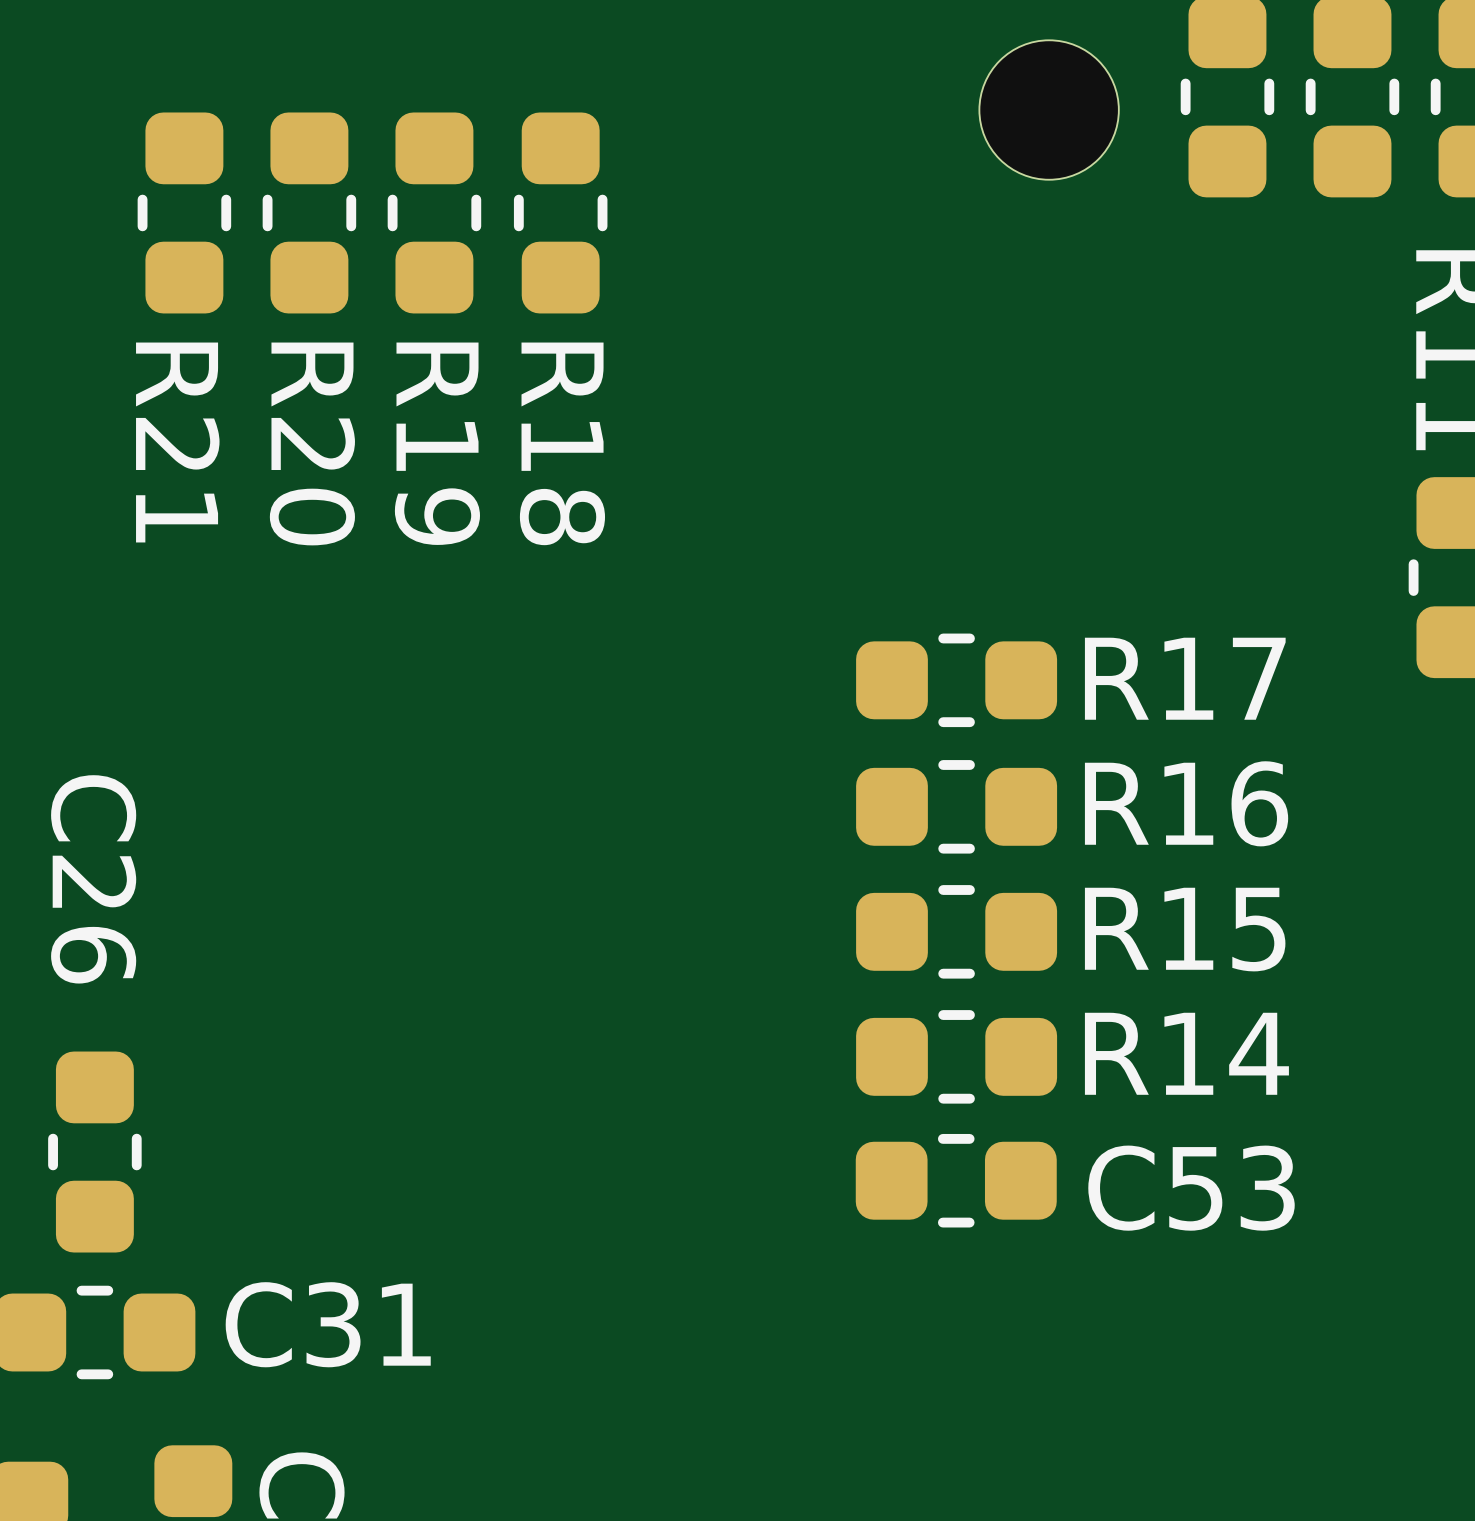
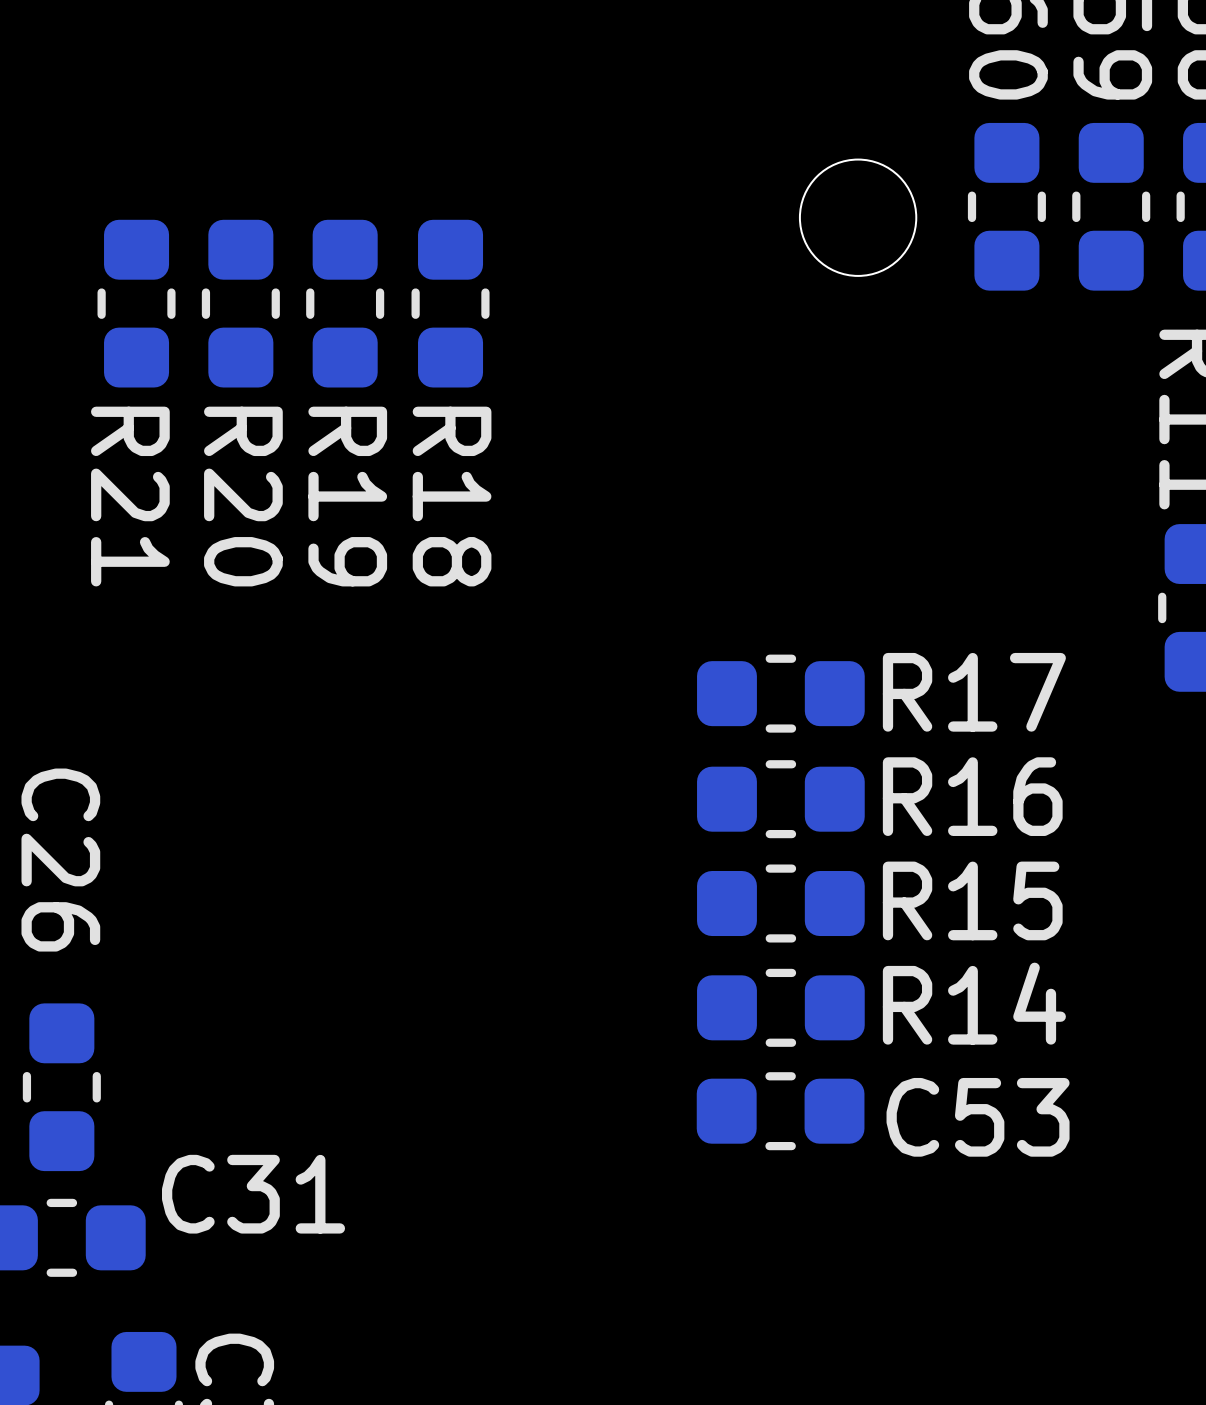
C31 name position: C31 (328, 1324) -> C31 (253, 1194)

